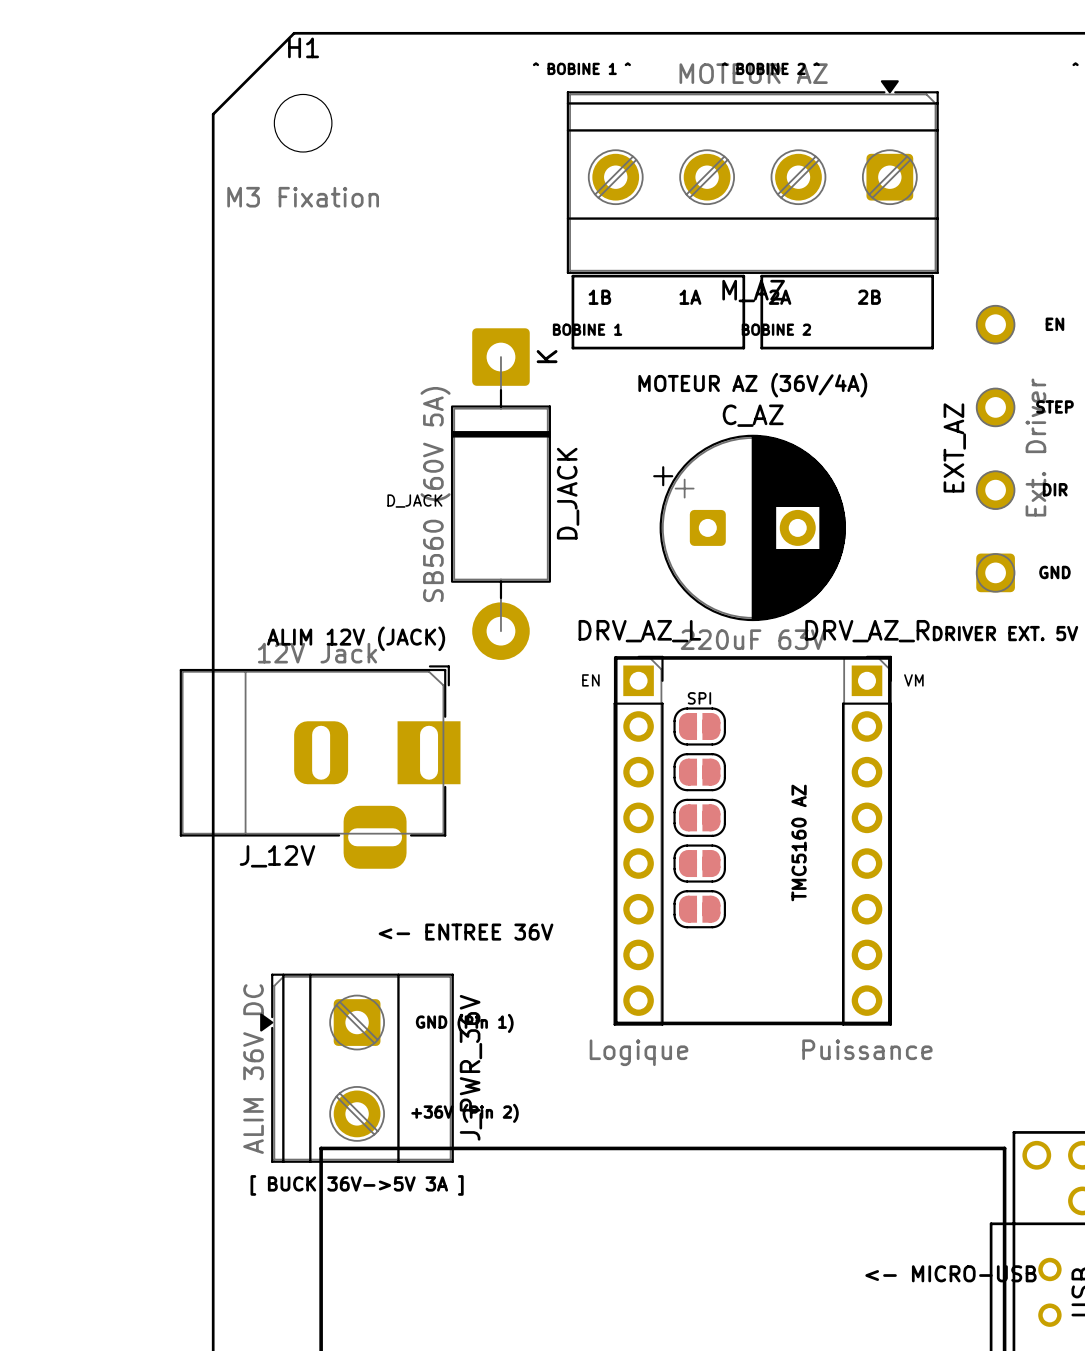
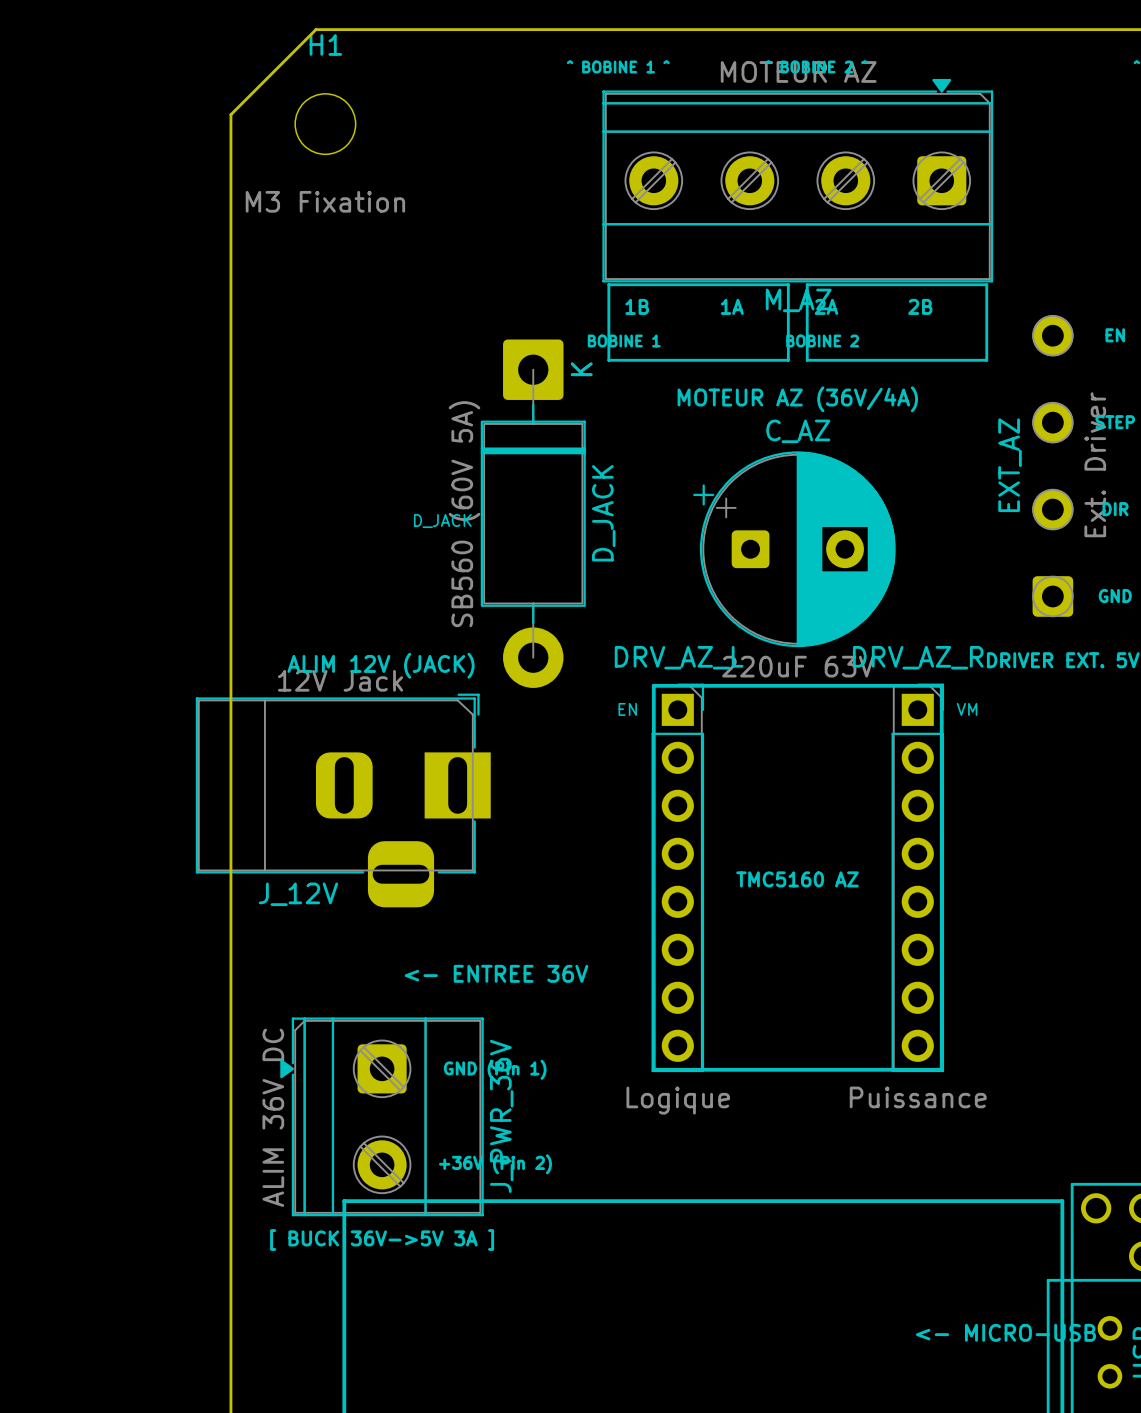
text: SPI (699, 698) -> none
part: (699, 726) -> none
part: (699, 772) -> none
part: (699, 817) -> none
text rotation: 0° (799, 842) -> 90° clockwise (797, 879)
part: (699, 863) -> none
part: (699, 909) -> none

